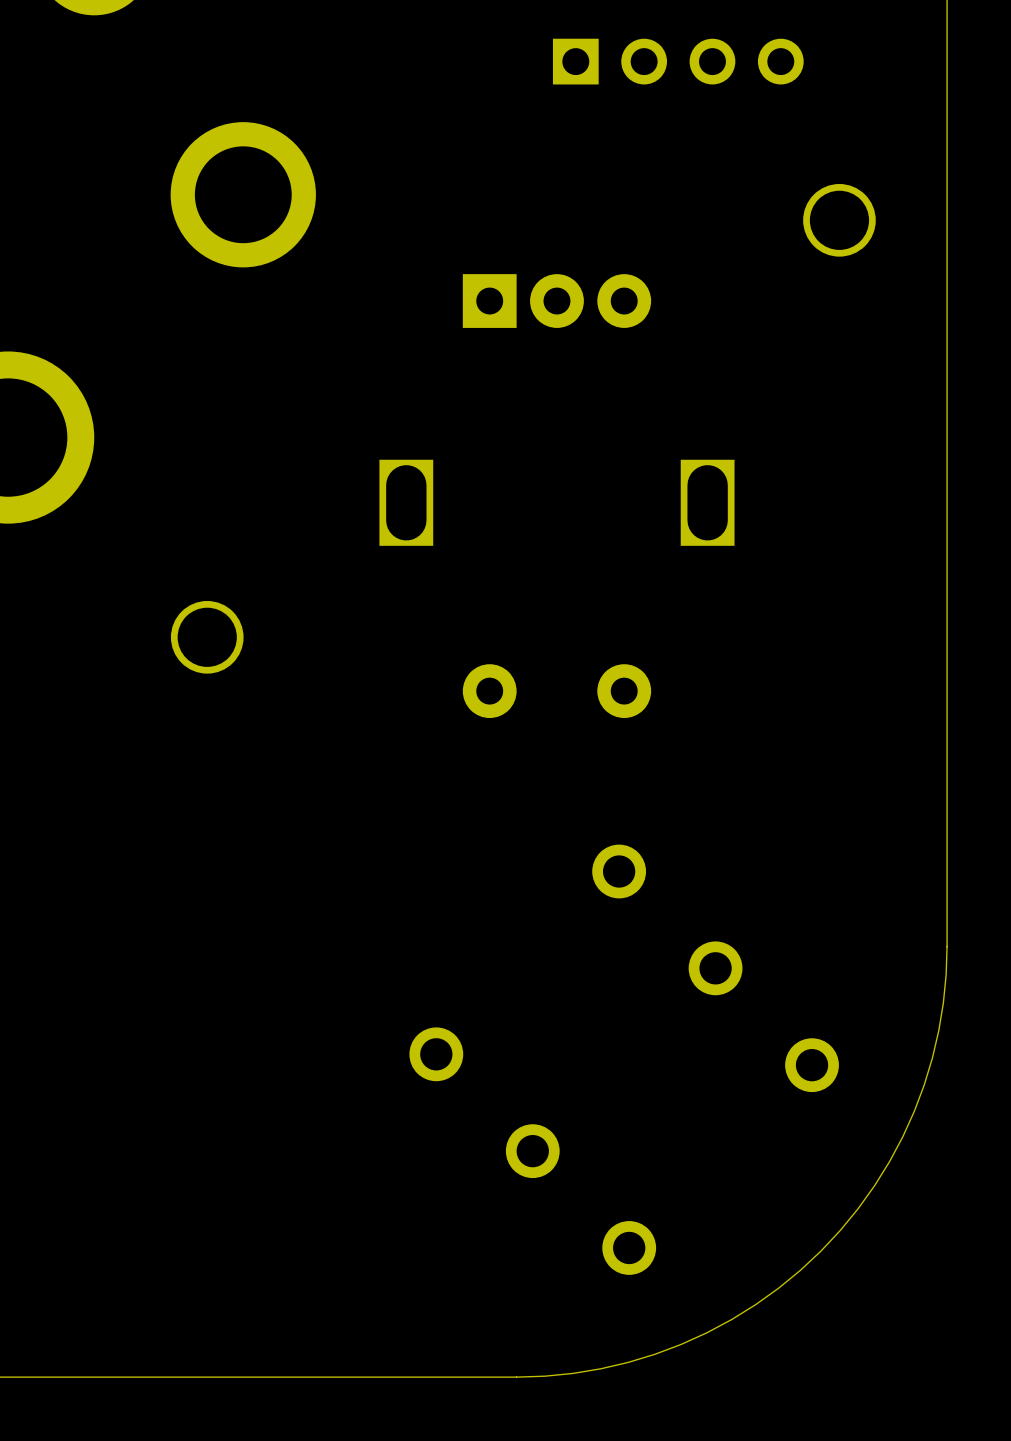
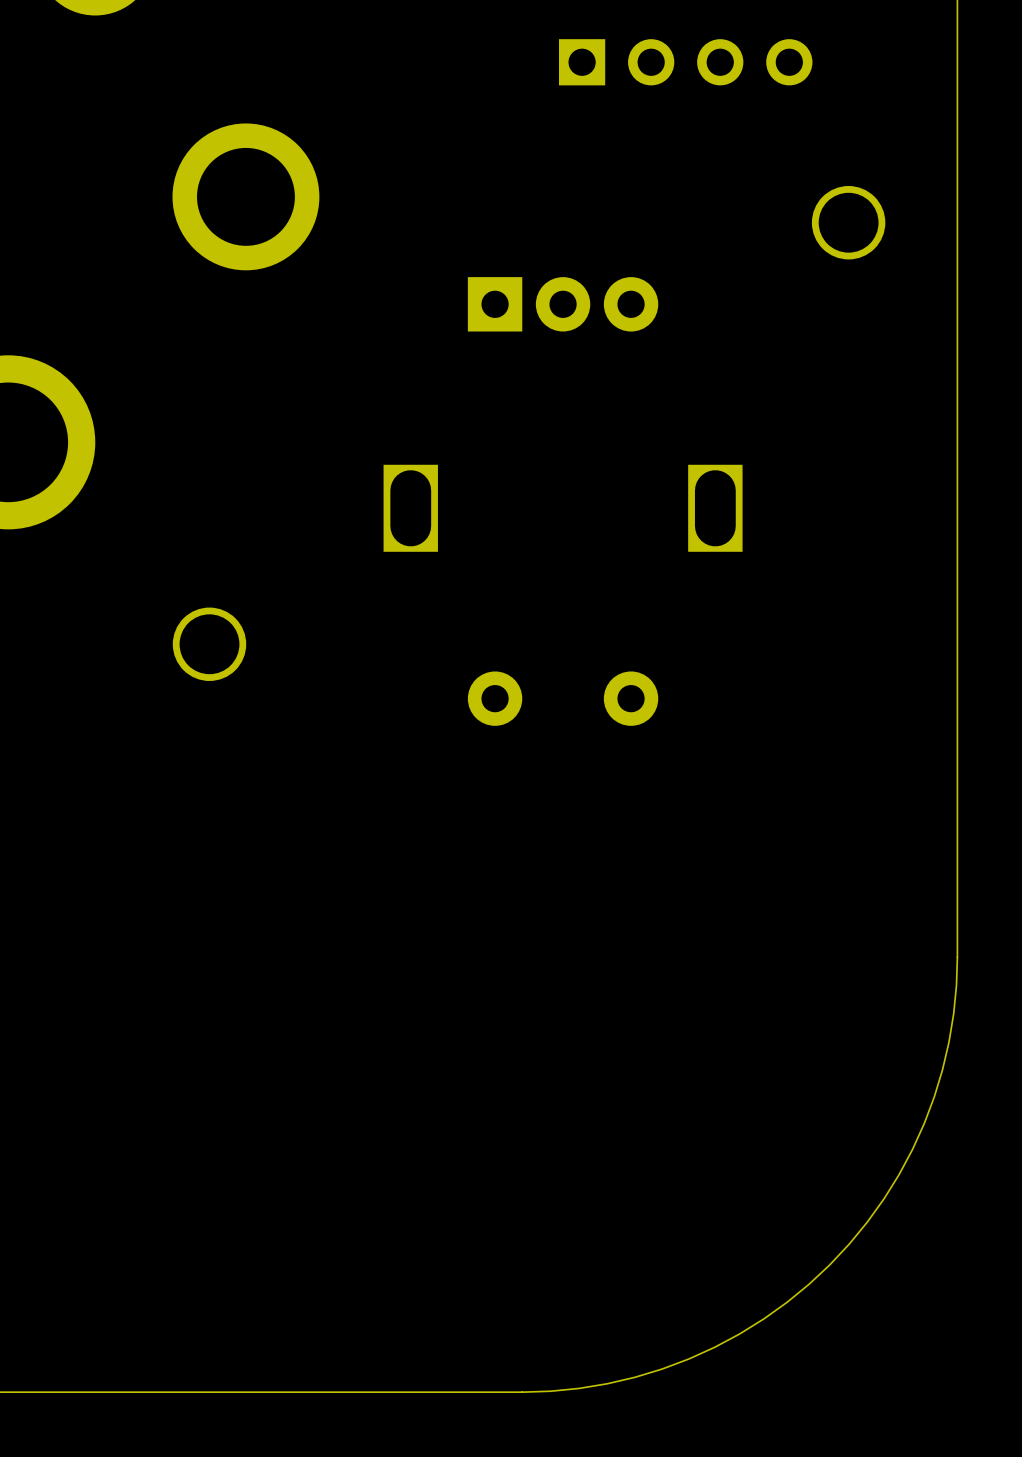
part: (715, 968) -> none
part: (532, 1151) -> none

